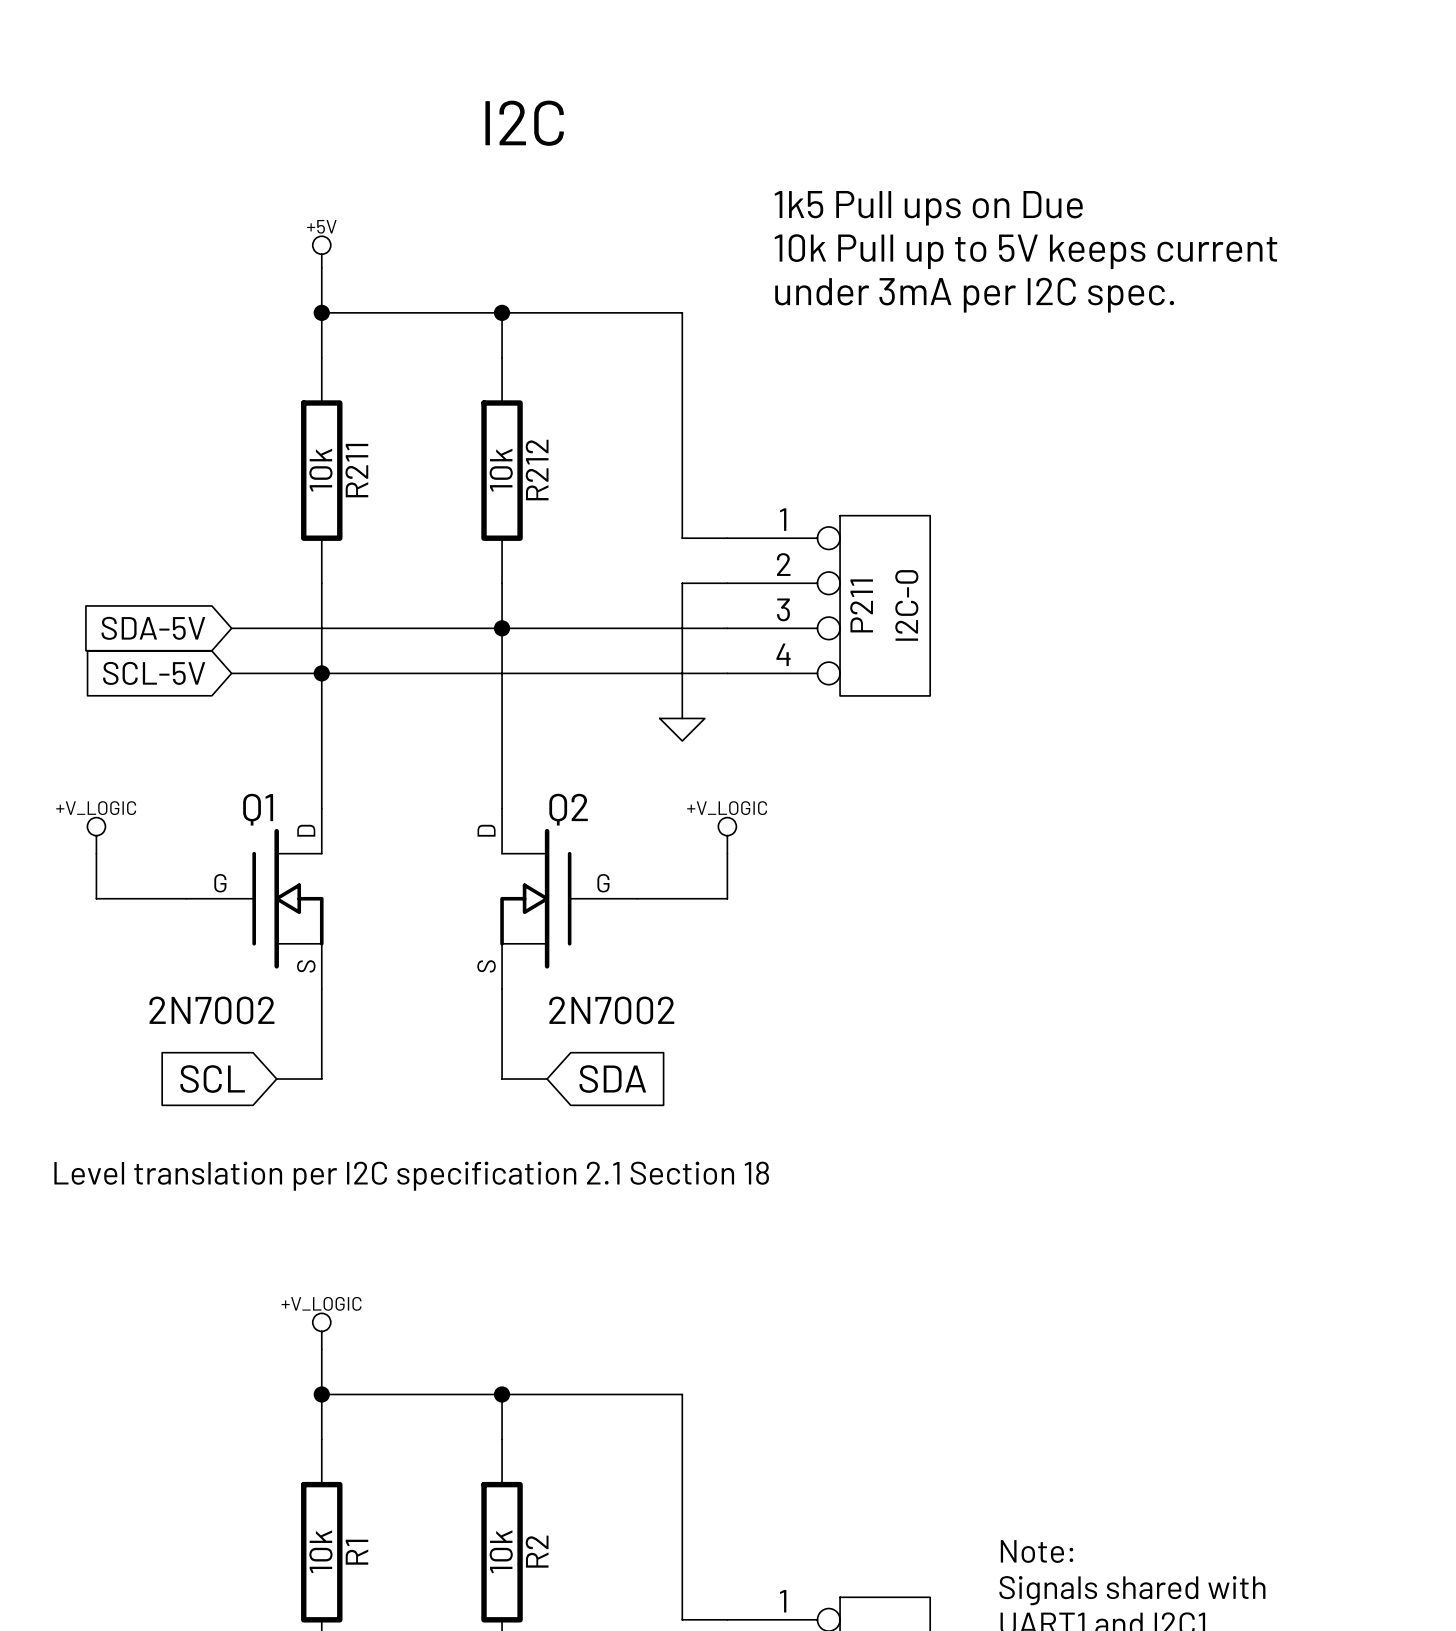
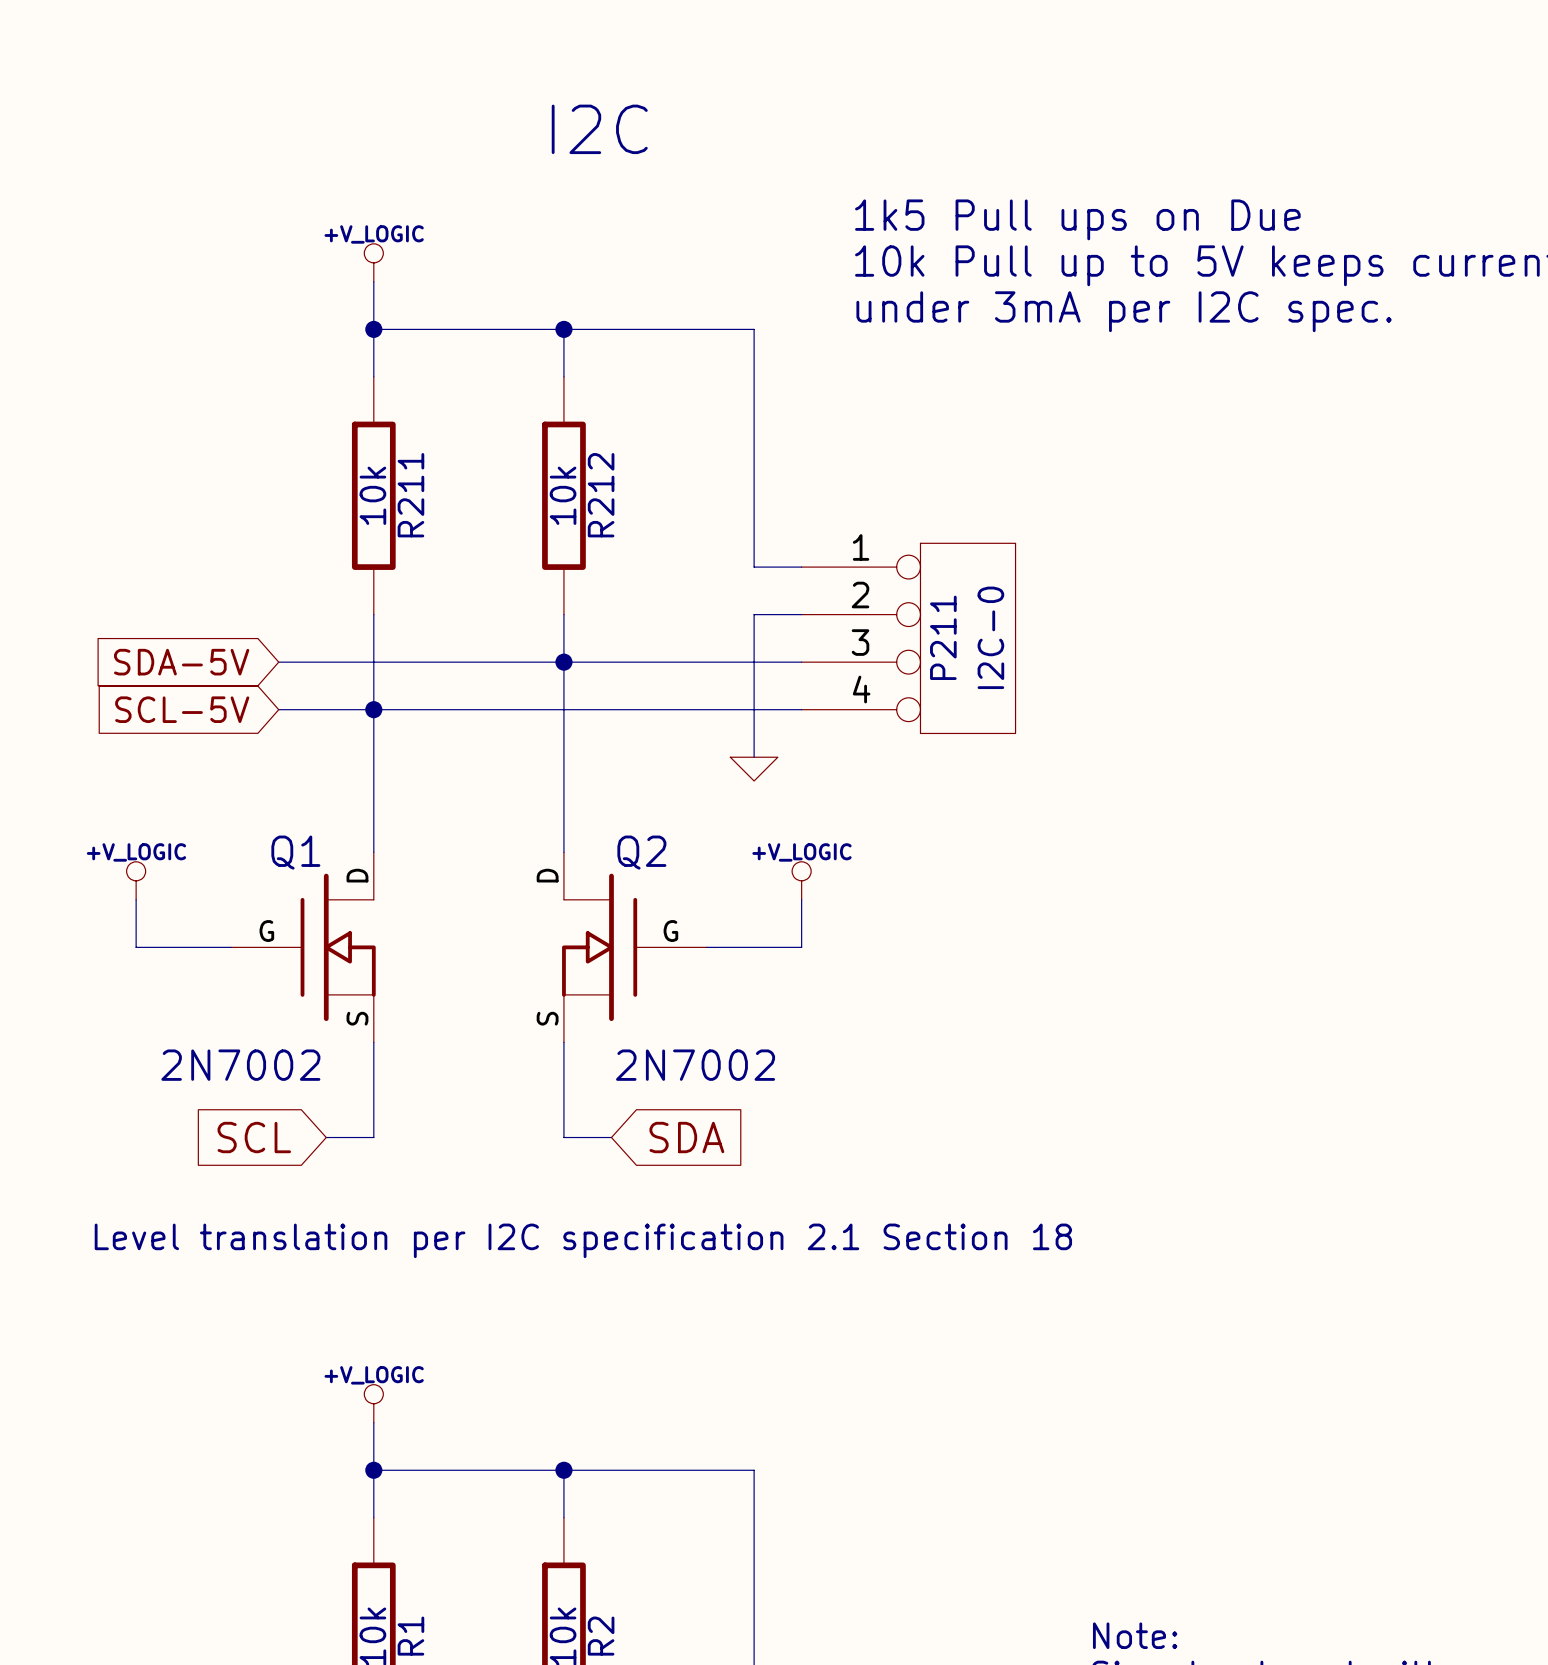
power symbol: +5V (321, 252) -> +V_LOGIC (373, 262)

